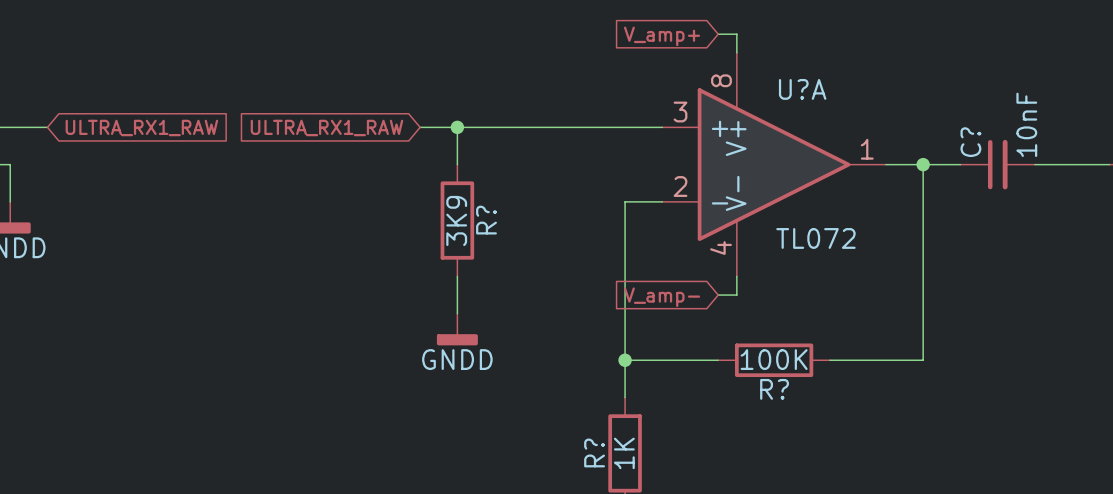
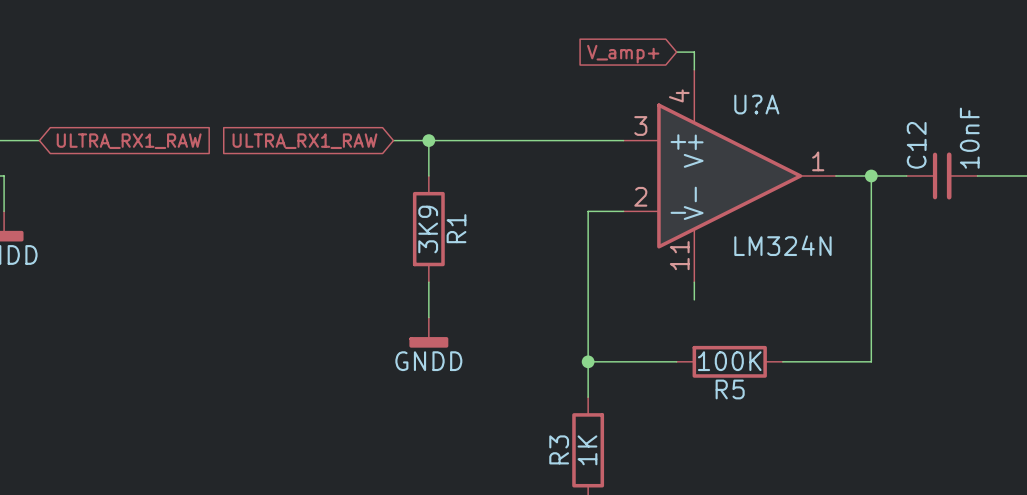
U?A pin number: 8 (721, 80) -> 4 (679, 95)
C? name: C? (970, 142) -> C12 (916, 145)
R? name: R? (486, 220) -> R1 (456, 228)
U?A value: TL072 (815, 238) -> LM324N (782, 245)
U?A pin number: 4 (721, 248) -> 11 (679, 255)
wire: (718, 295) (736, 295) -> none
global label: V_amp- (662, 297) -> none
R? name: R? (774, 389) -> R5 (730, 389)
R? name: R? (594, 452) -> R3 (559, 449)

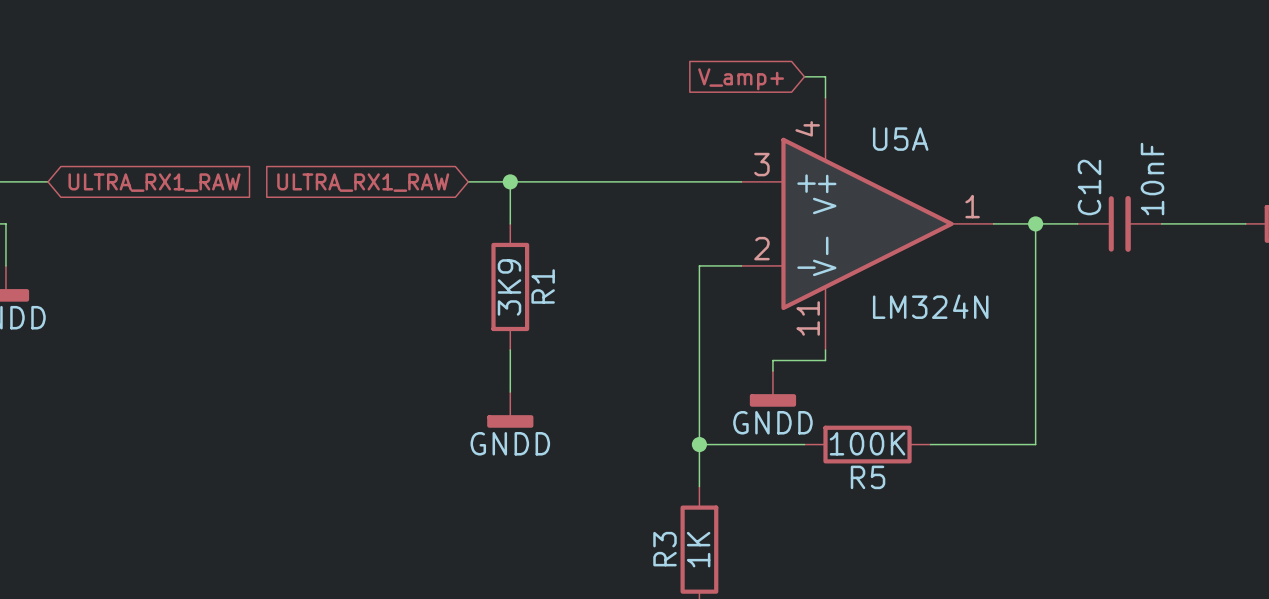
U?A name: U?A (756, 104) -> U5A (900, 139)
wire: (694, 291) (694, 299) -> (825, 360) (772, 360) (772, 371)
power symbol: none -> GNDD (772, 388)

